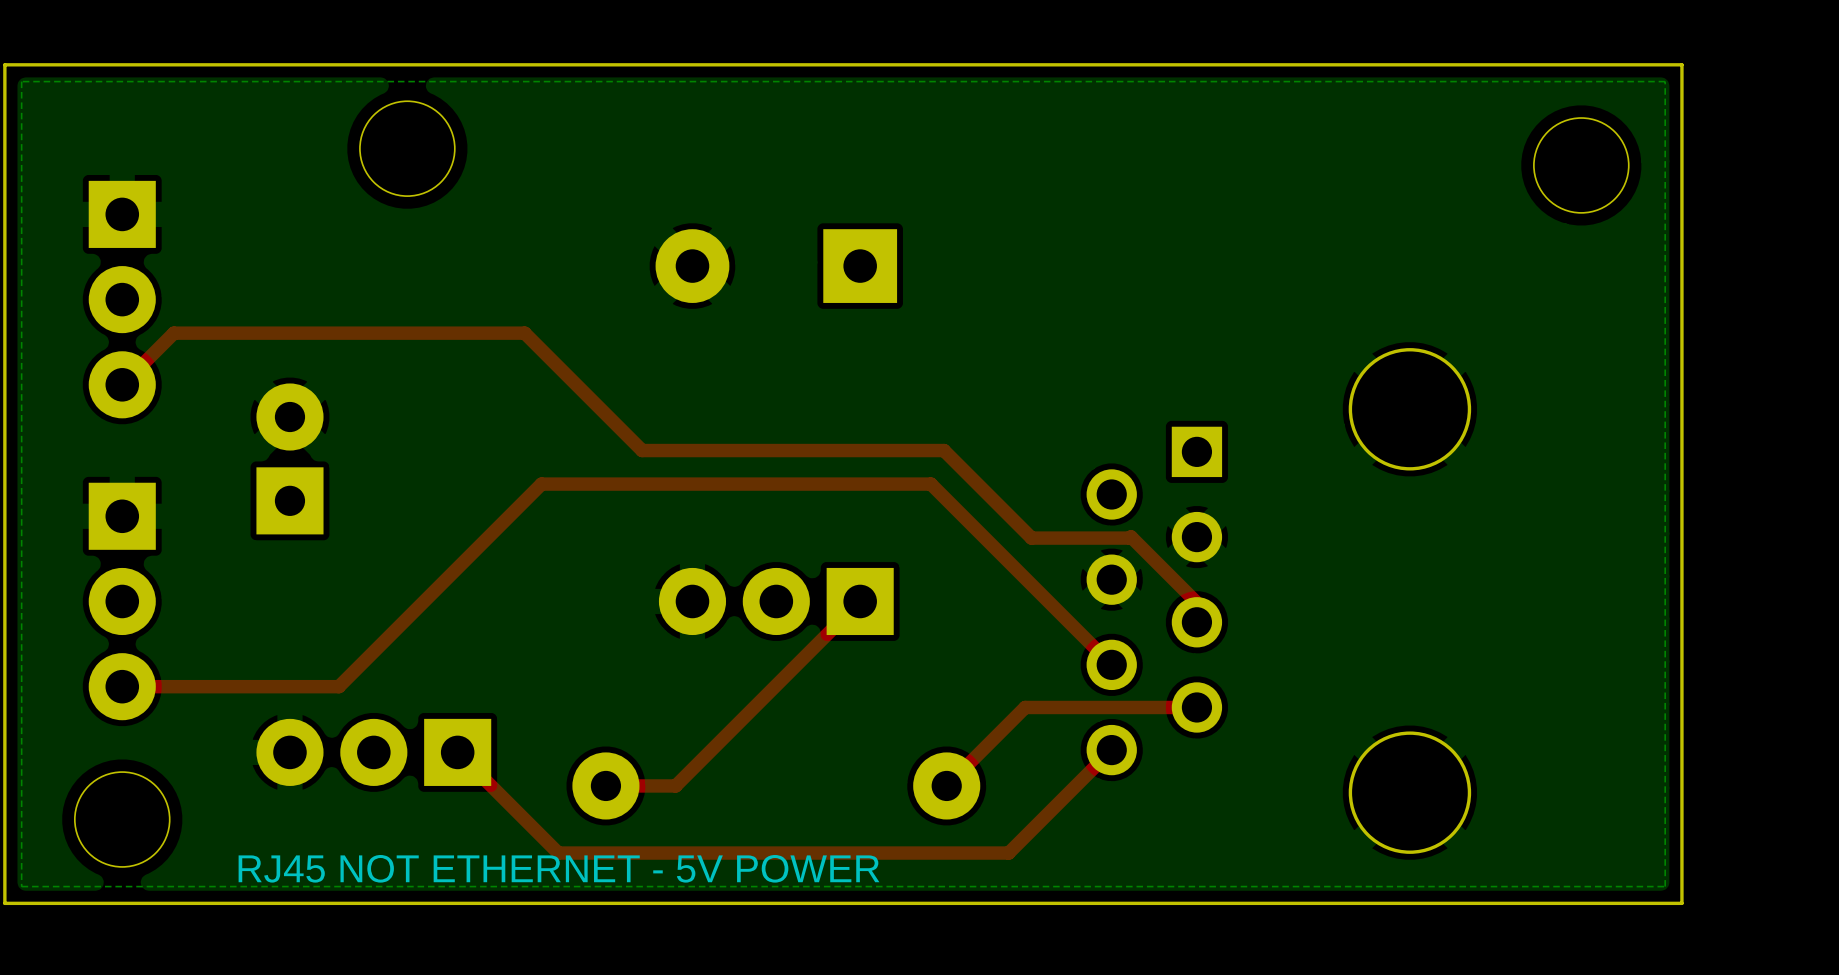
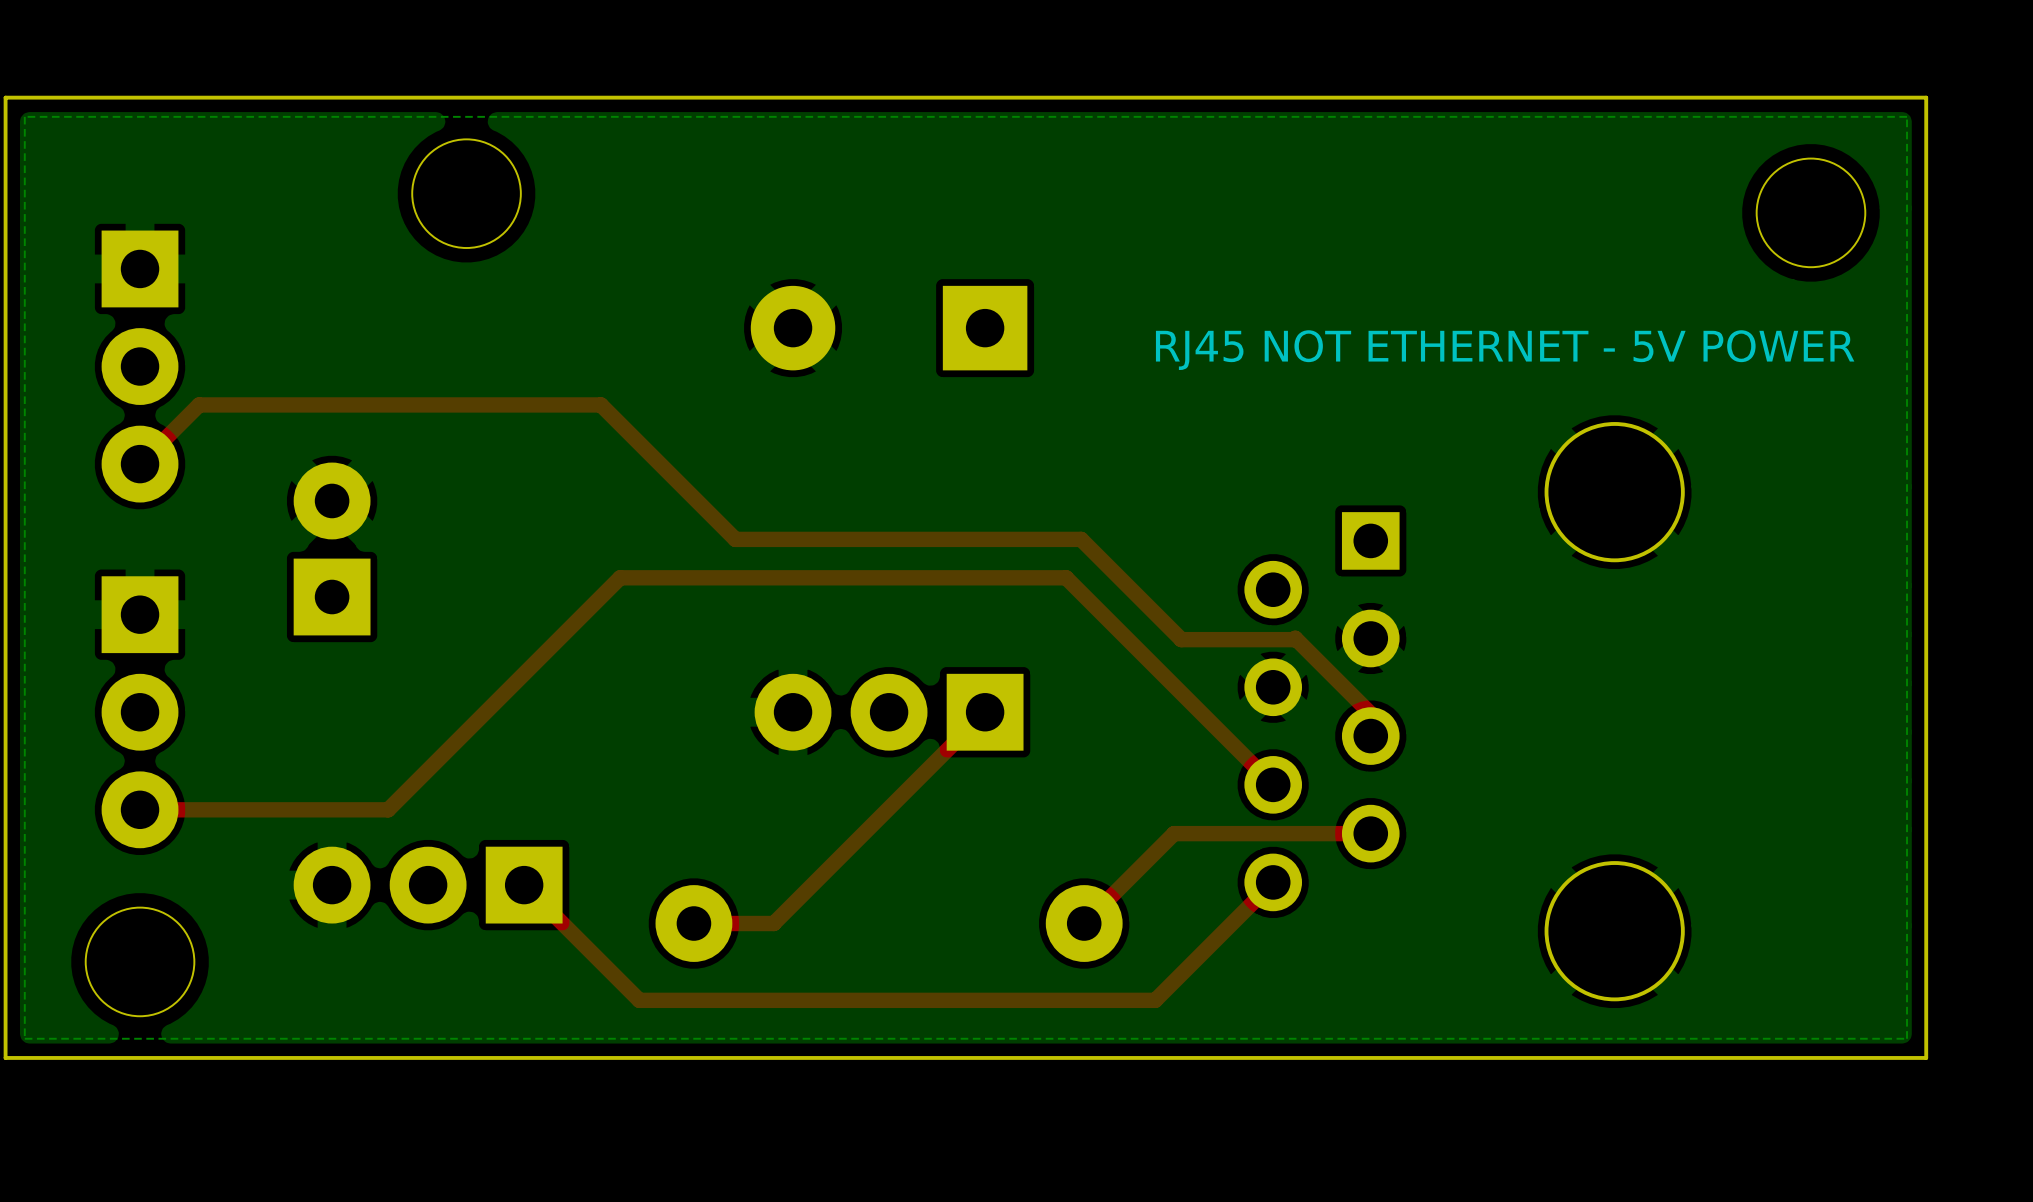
text: none -> RJ45 NOT ETHERNET - 5V POWER (1505, 350)
text: RJ45 NOT ETHERNET - 5V POWER (559, 868) -> none

